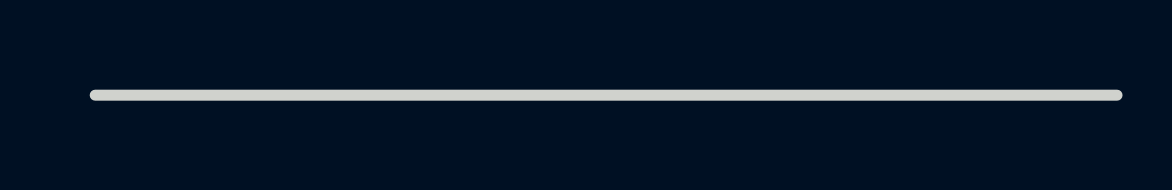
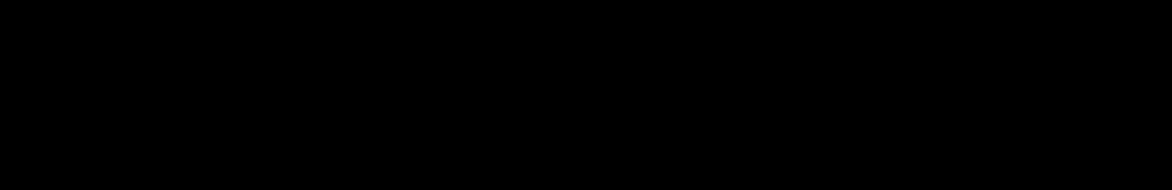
board edge: (95, 95) (1117, 95) -> none

